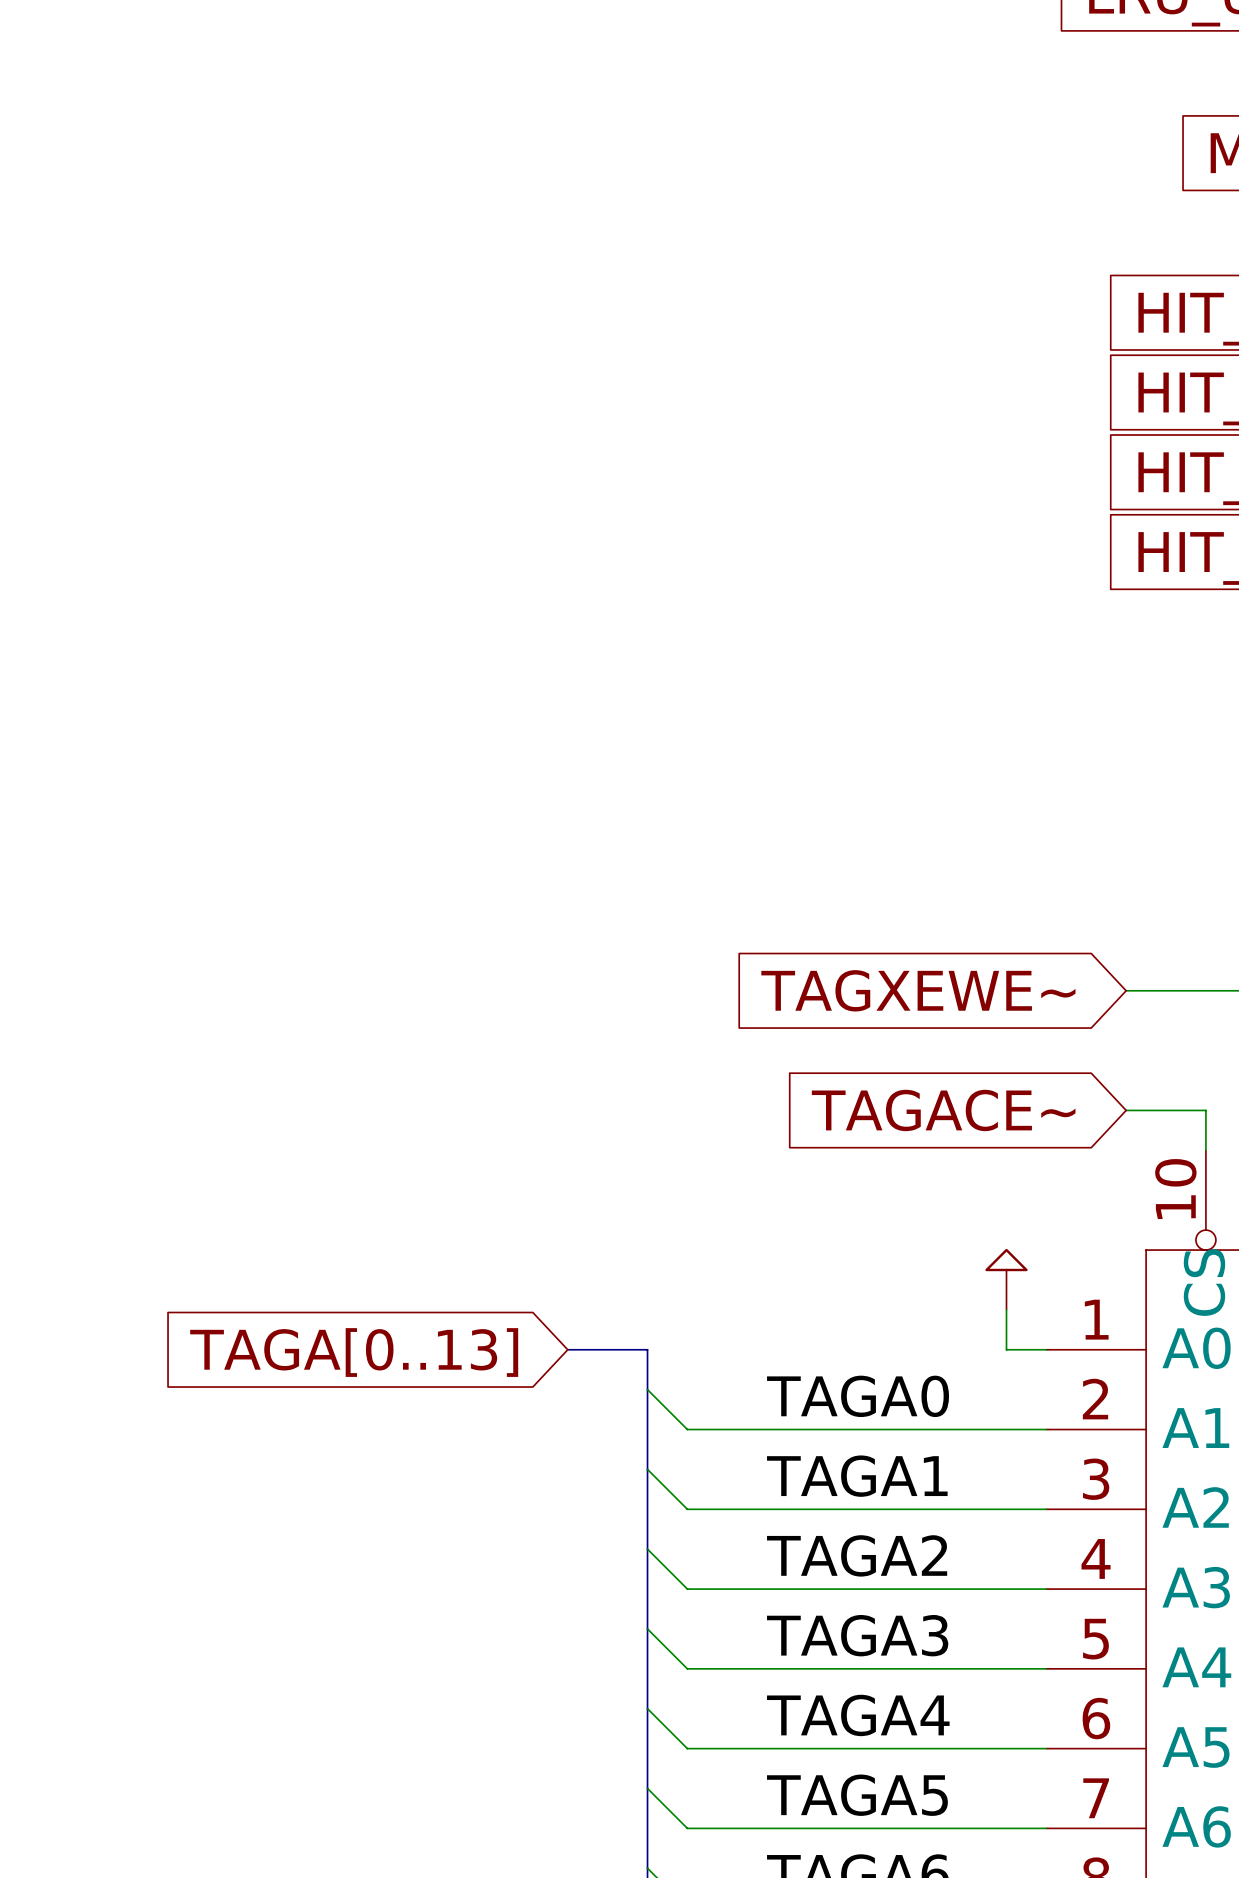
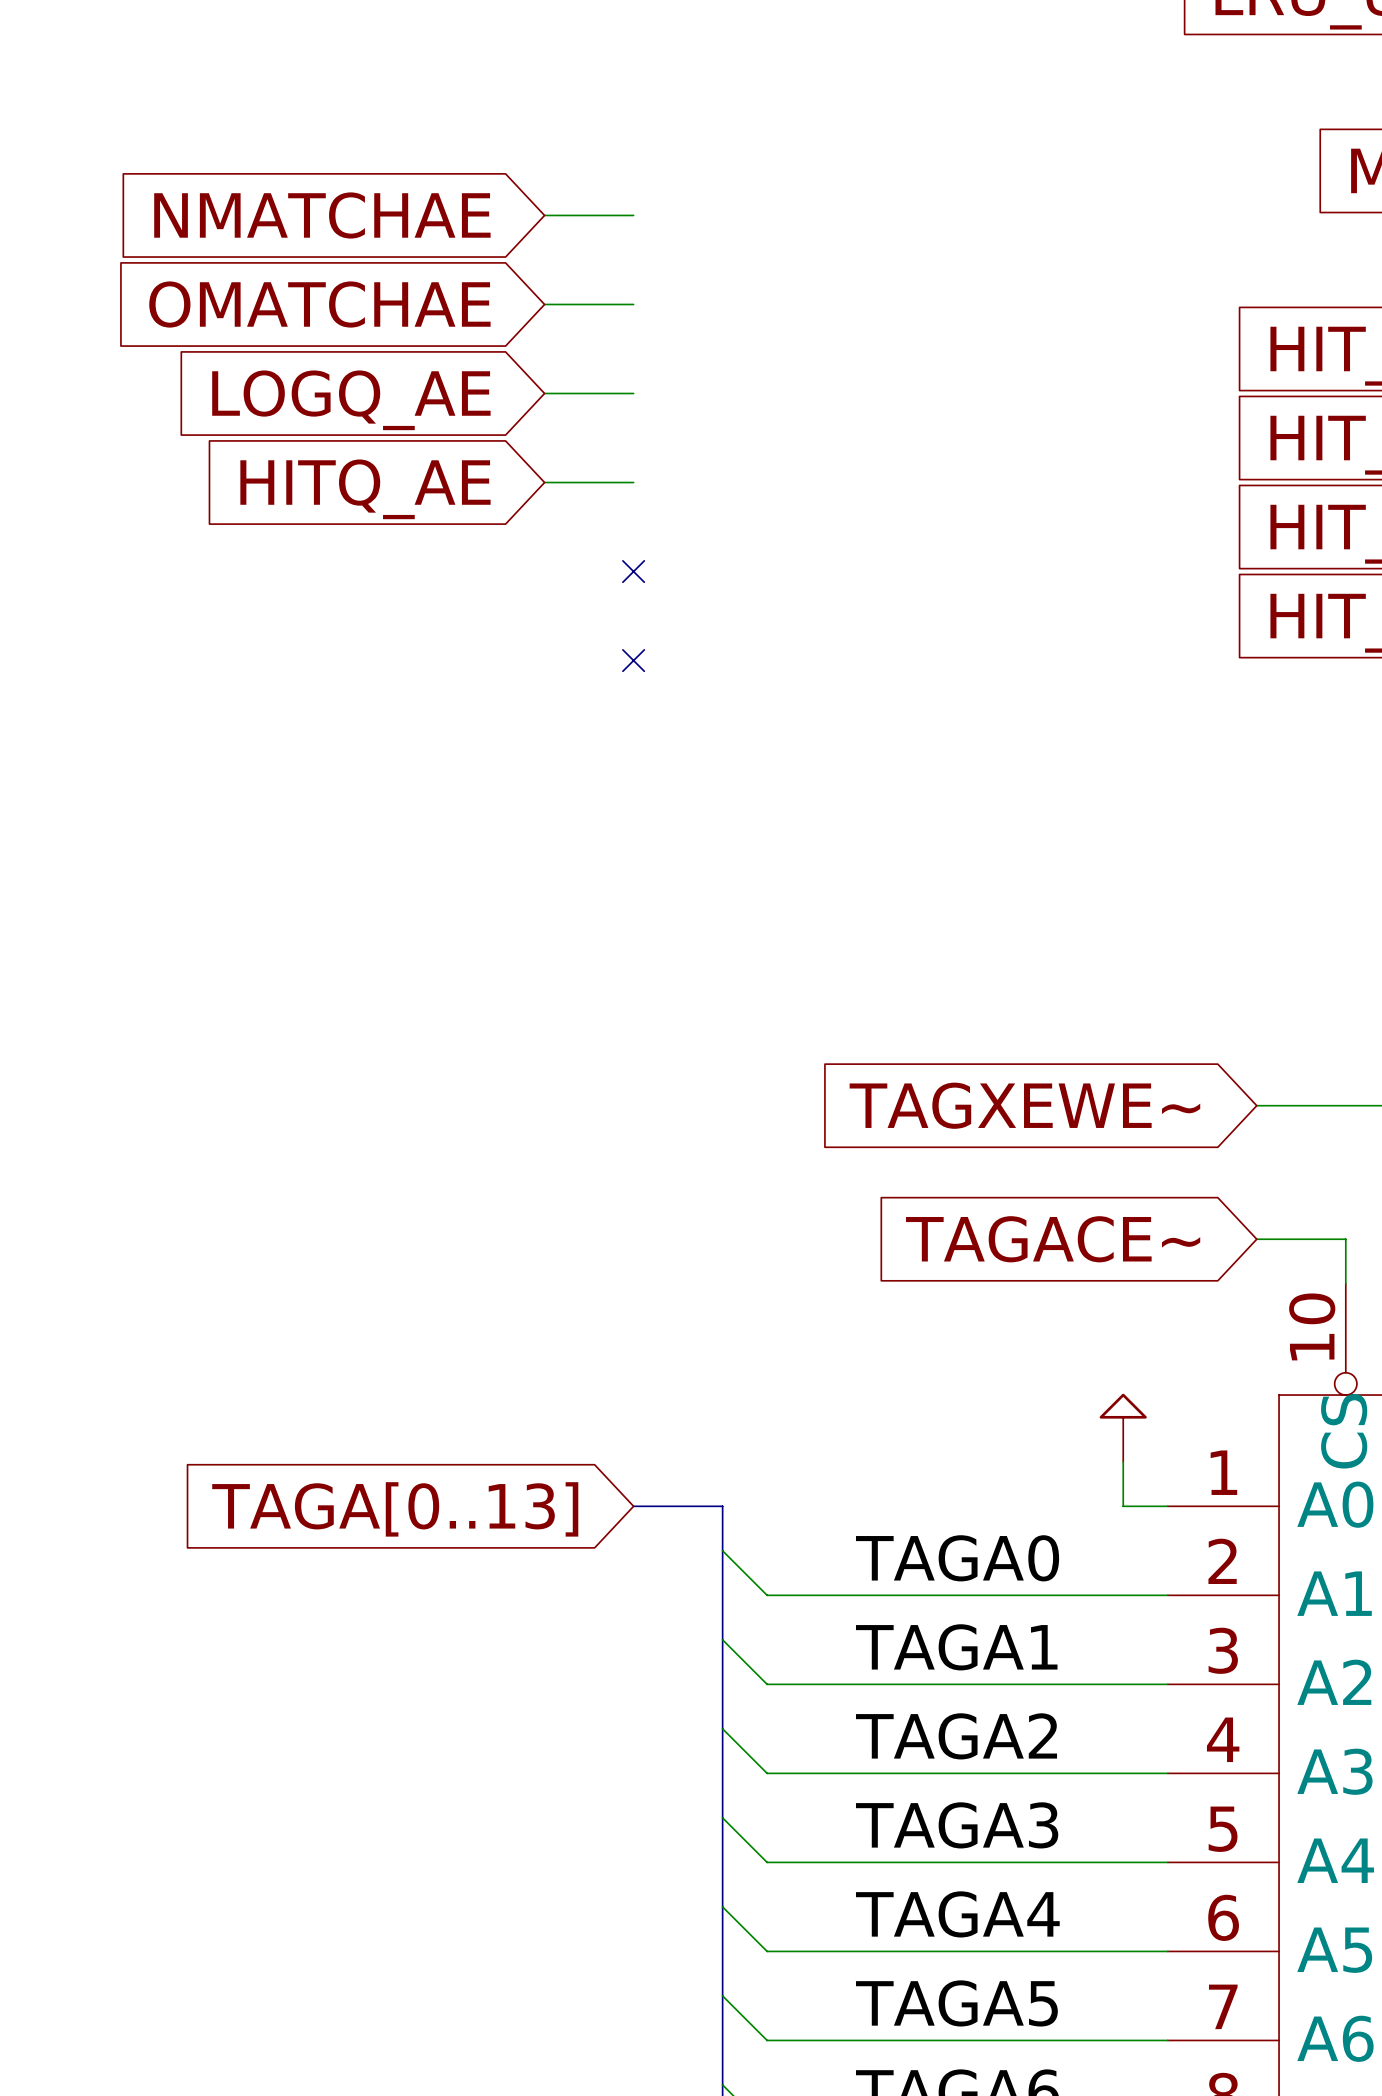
global label: none -> NMATCHAE (322, 215)
wire: none -> (544, 215) (633, 215)
global label: none -> OMATCHAE (319, 304)
wire: none -> (544, 304) (633, 304)
wire: none -> (544, 393) (633, 393)
global label: none -> LOGQ_AE (351, 400)
wire: none -> (544, 482) (633, 482)
global label: none -> HITQ_AE (365, 489)
no-connect mark: none -> (633, 571)
no-connect mark: none -> (633, 660)

